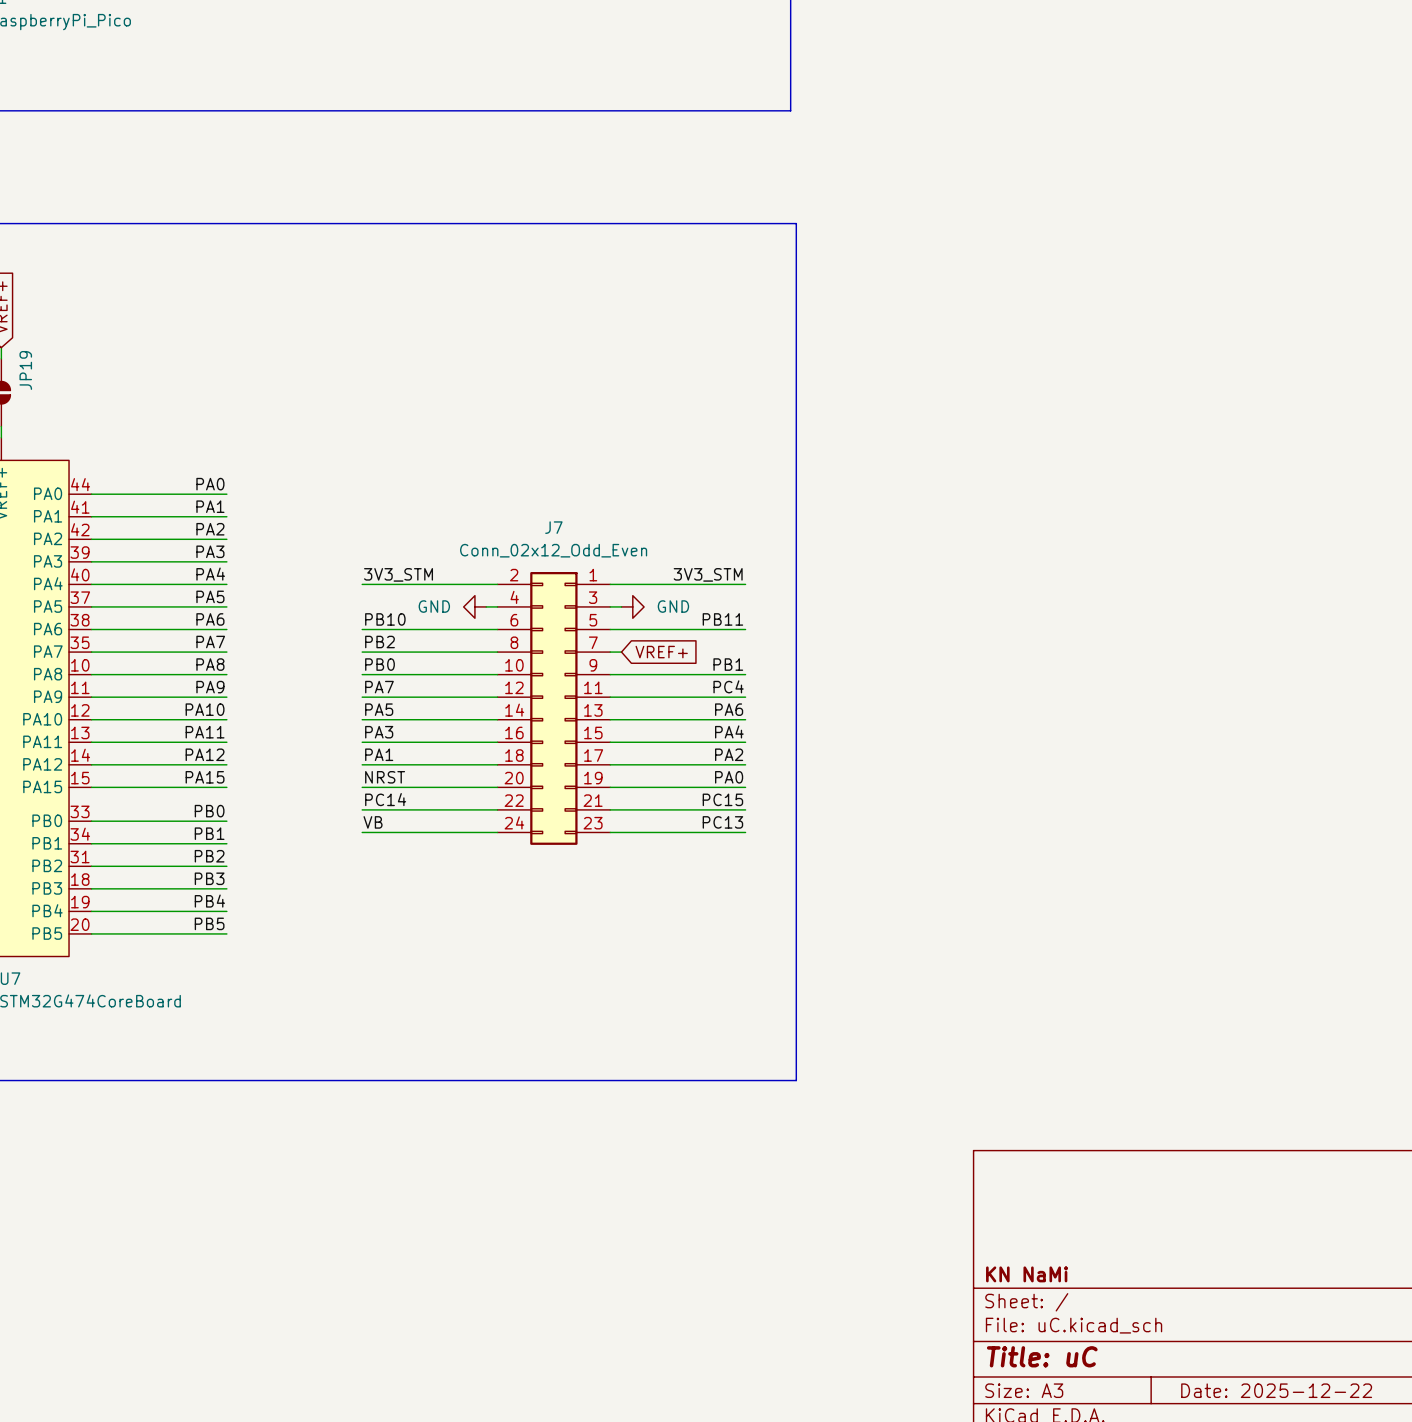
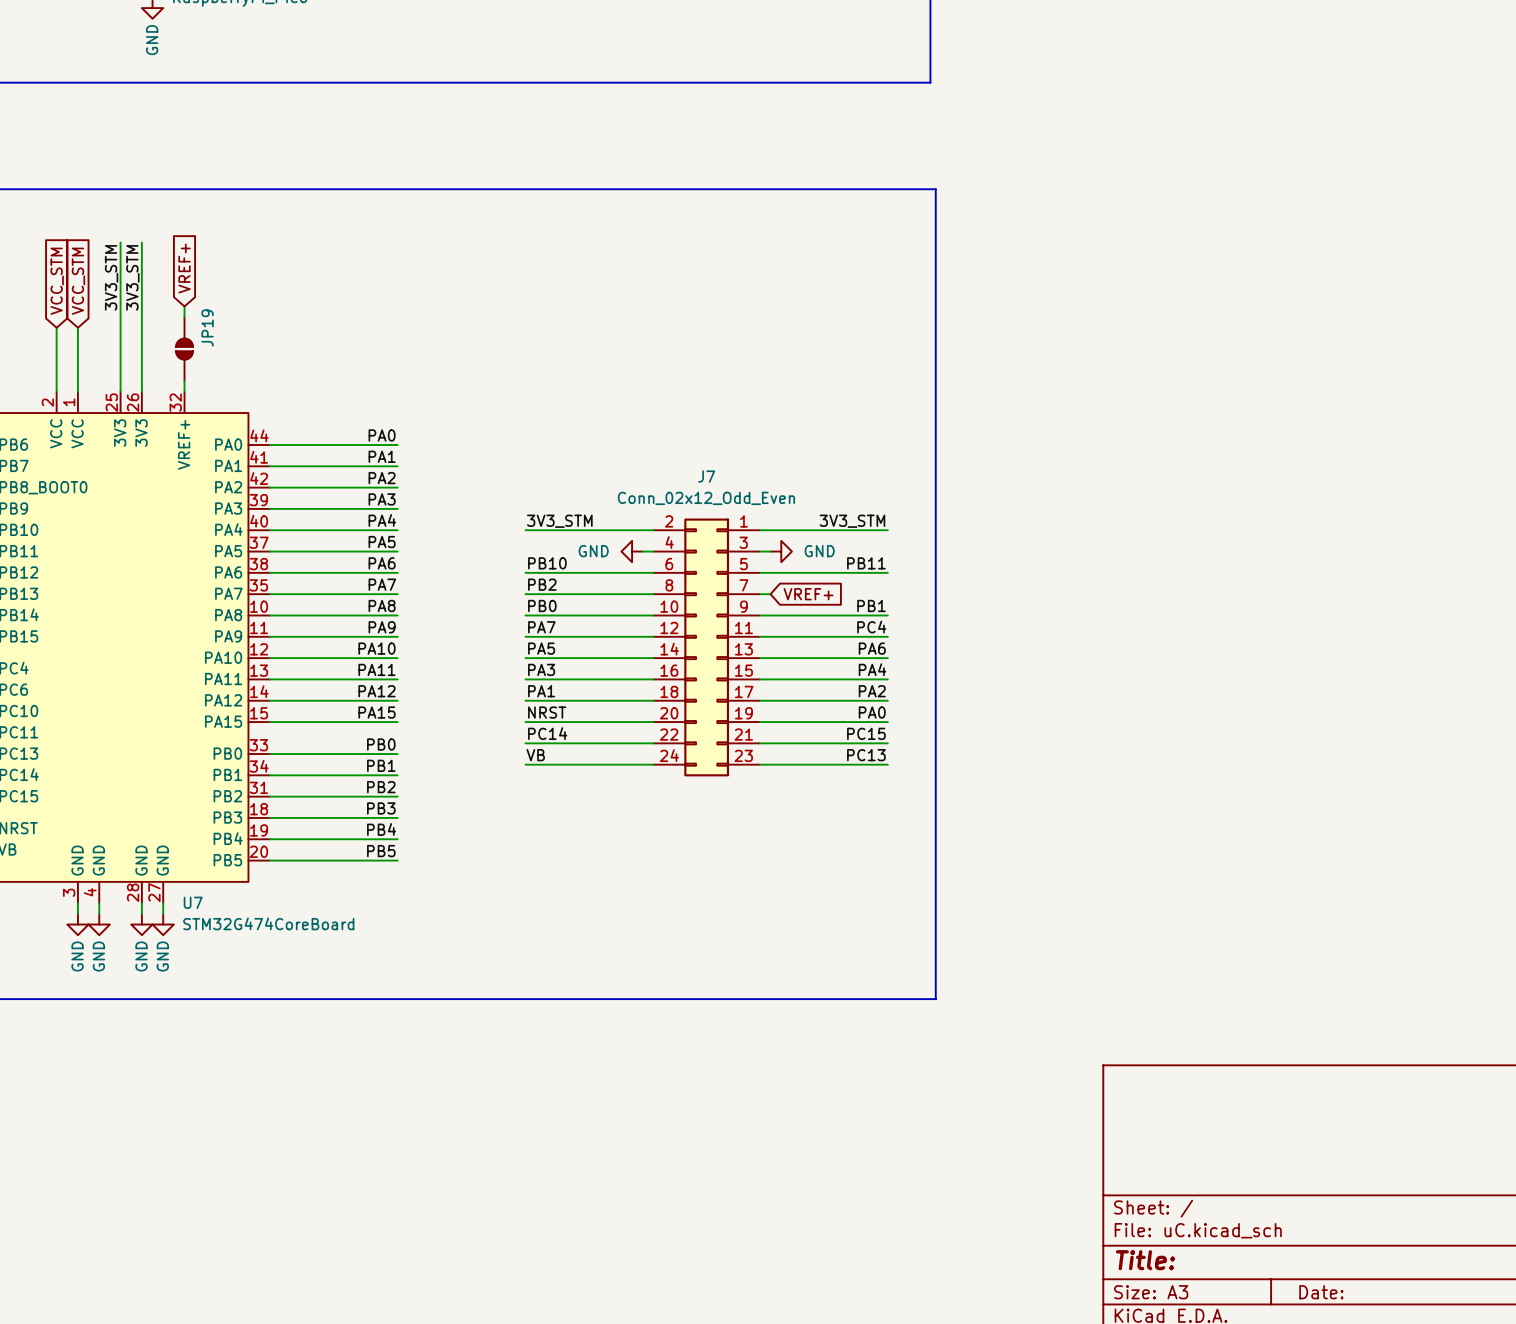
title block: KN NaMi (1027, 1274) -> none
title block: Title: uC (1042, 1356) -> Title: (1145, 1260)
title block: Date: 2025-12-22 (1276, 1390) -> Date: (1321, 1292)

